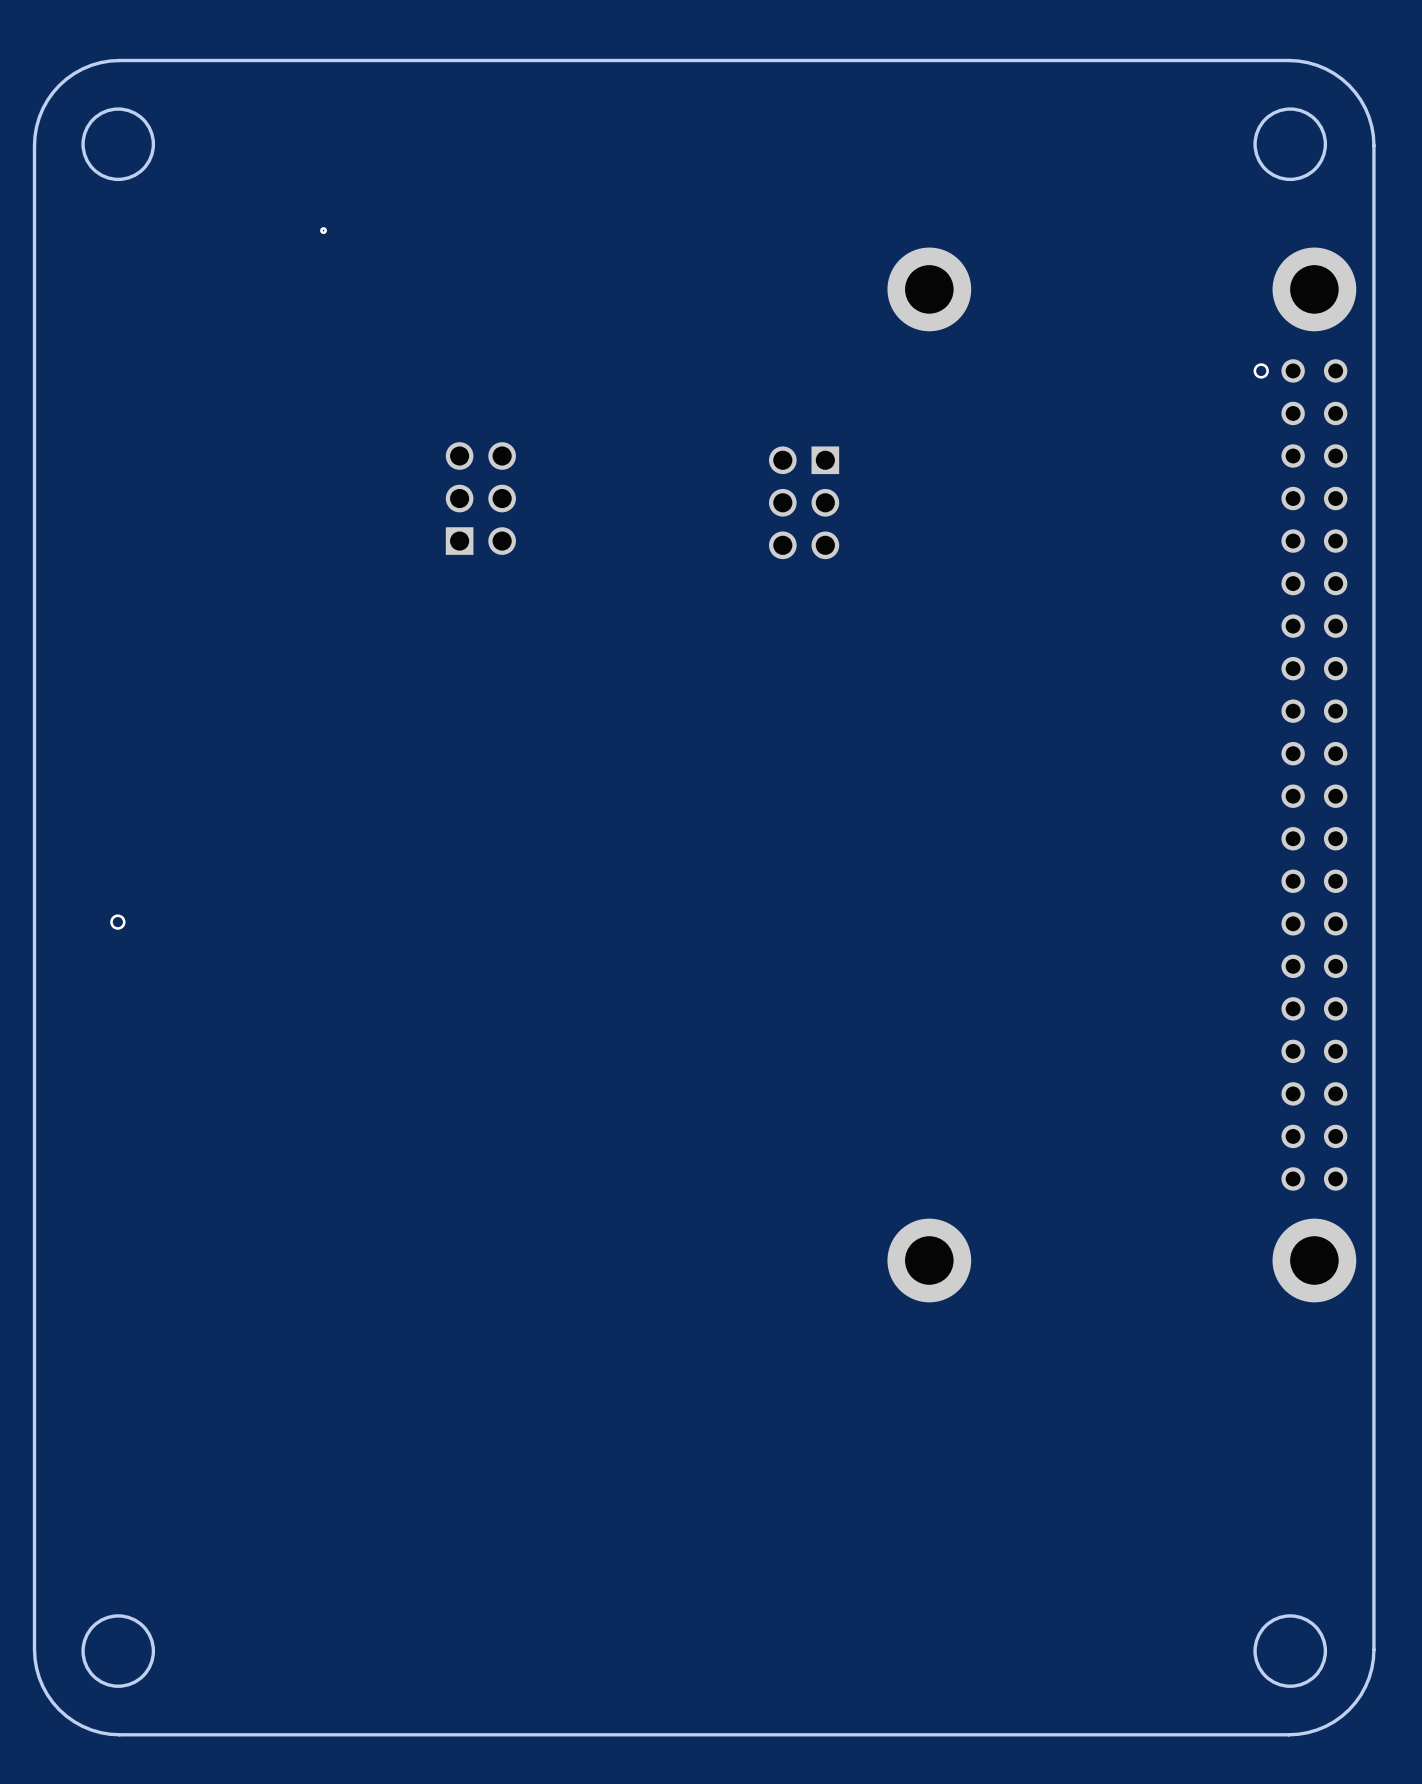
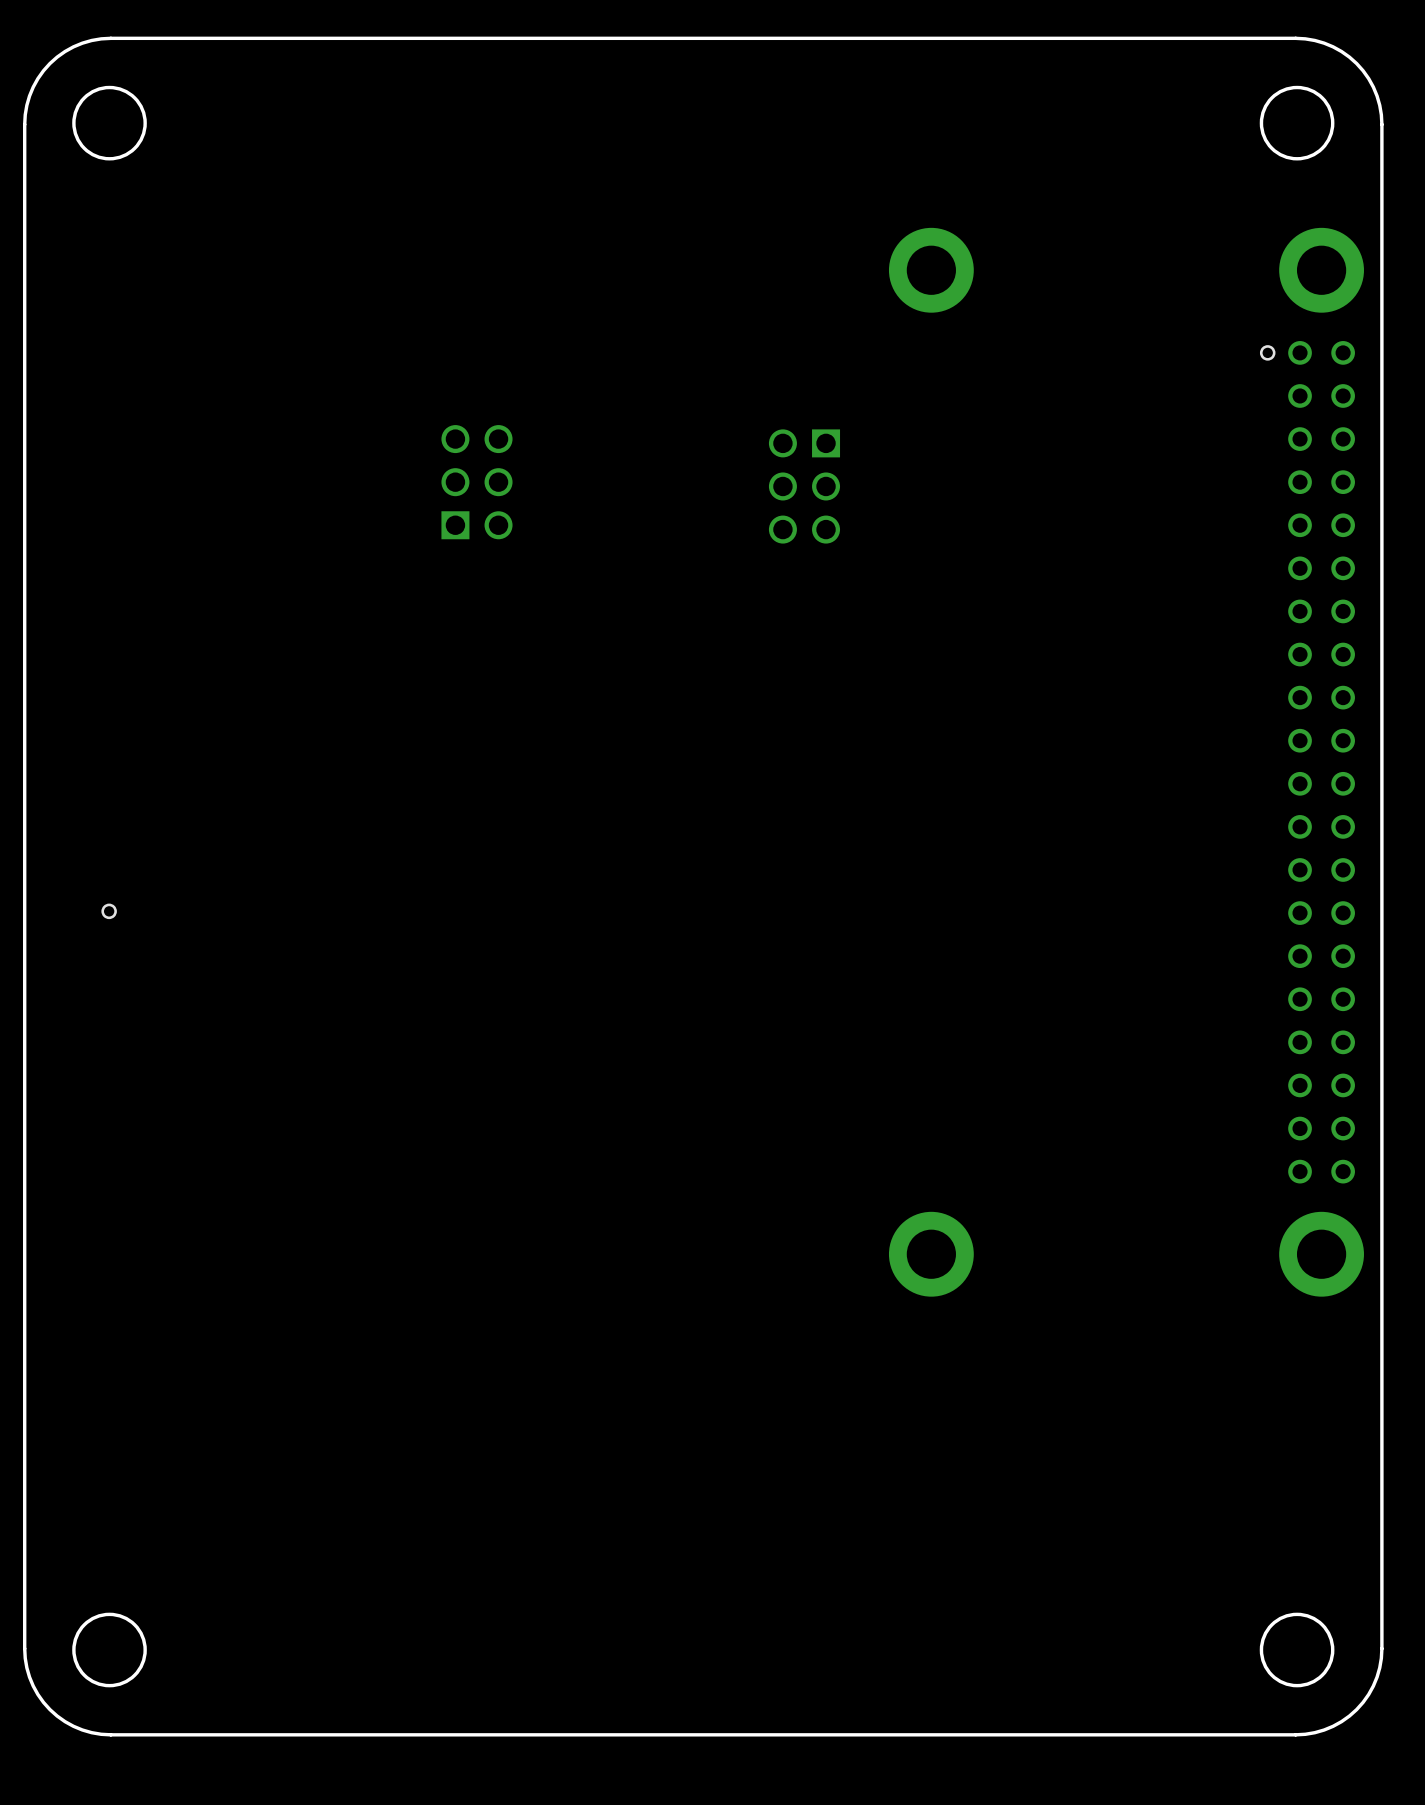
part: (323, 230) -> none

